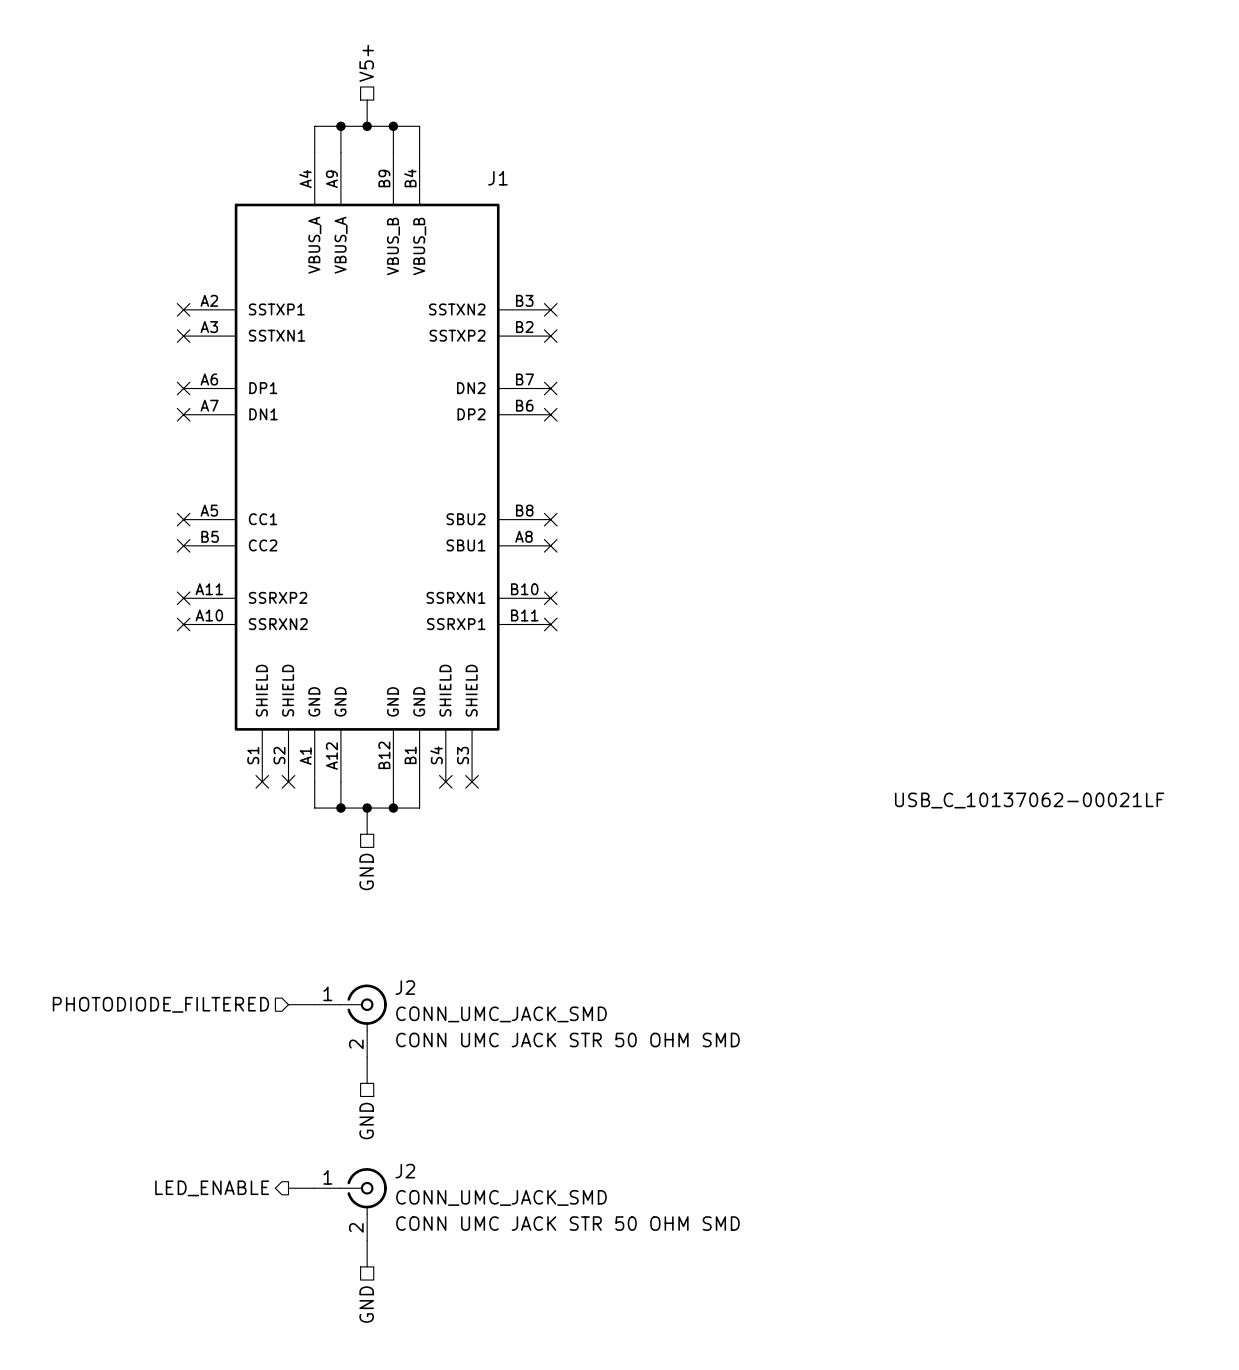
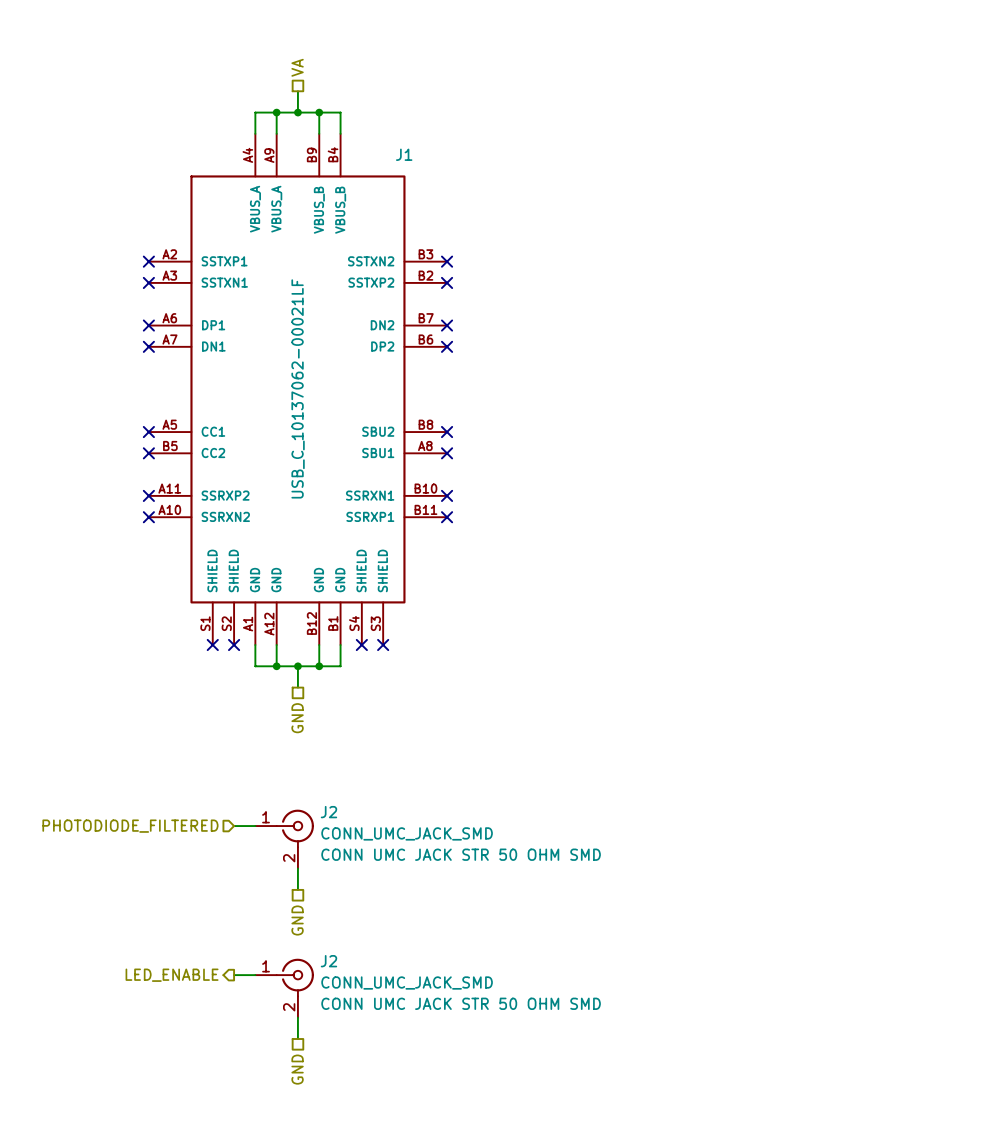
hierarchical label: V5+ (366, 63) -> VA (297, 67)
J1 value rotation: 0° (1029, 800) -> 90° counterclockwise (298, 388)
J1 value position: USB_C_10137062-00021LF (1029, 800) -> USB_C_10137062-00021LF (298, 388)

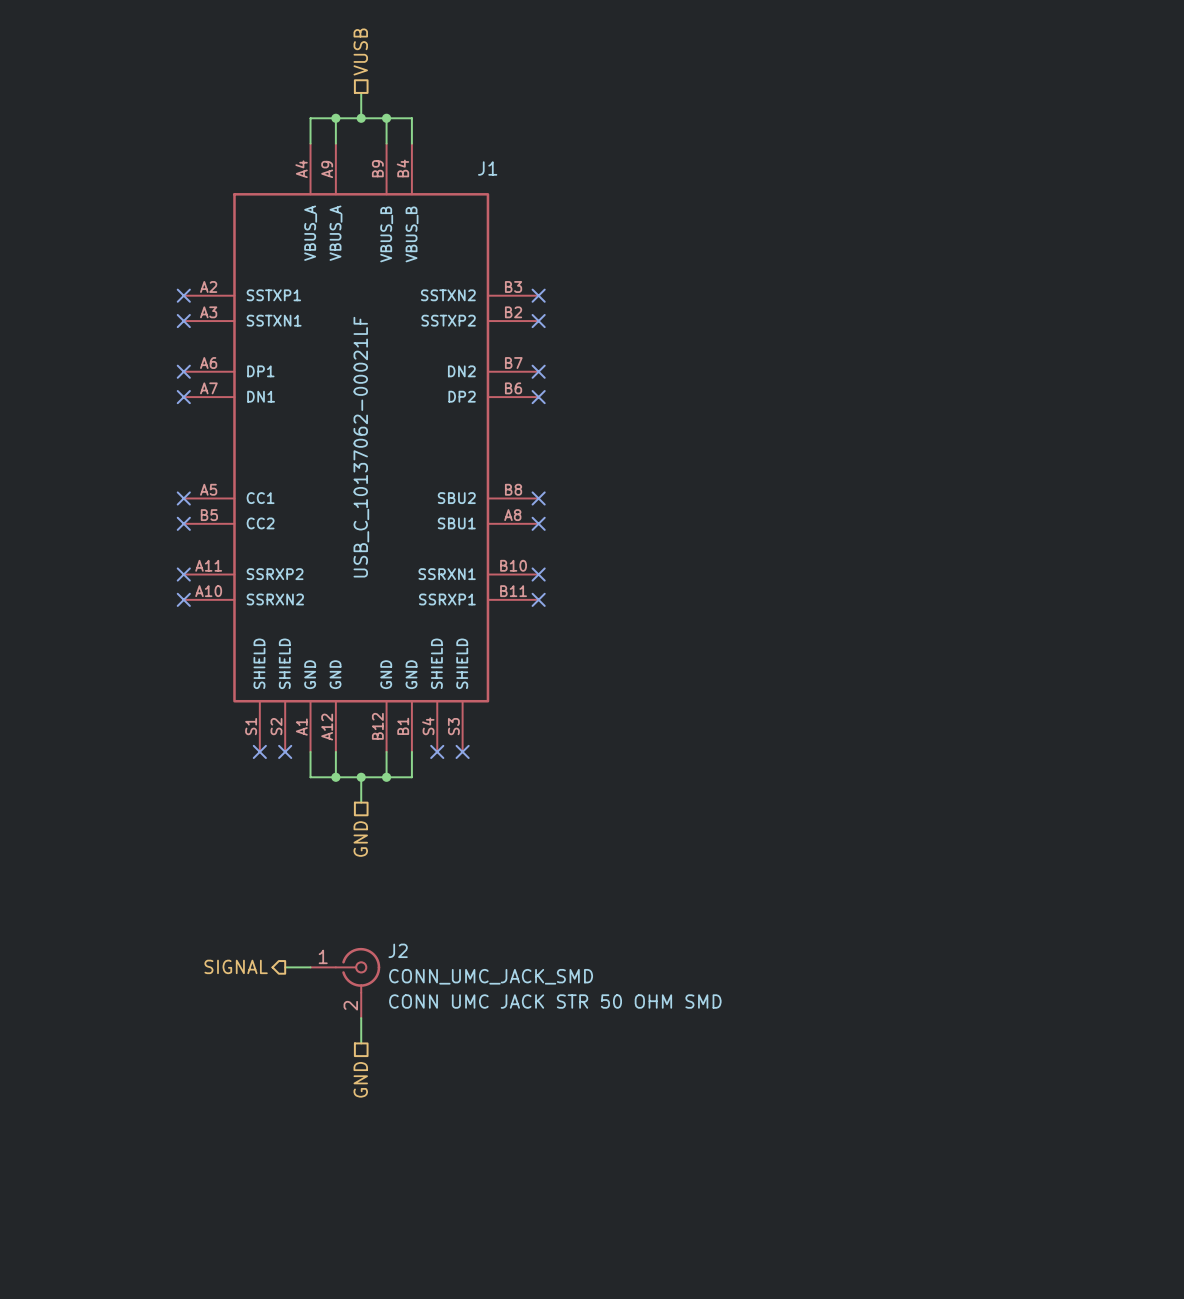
hierarchical label: VA (297, 67) -> VUSB (360, 52)
hierarchical label shape: input (130, 826) -> output (236, 966)
hierarchical label: PHOTODIODE_FILTERED (130, 826) -> SIGNAL (236, 966)
hierarchical label: LED_ENABLE (172, 975) -> none
wire: (234, 975) (255, 975) -> none
J2: CONN_UMC_JACK_SMD (284, 988) -> none
wire: (297, 1017) (297, 1039) -> none
hierarchical label: GND (297, 1069) -> none

